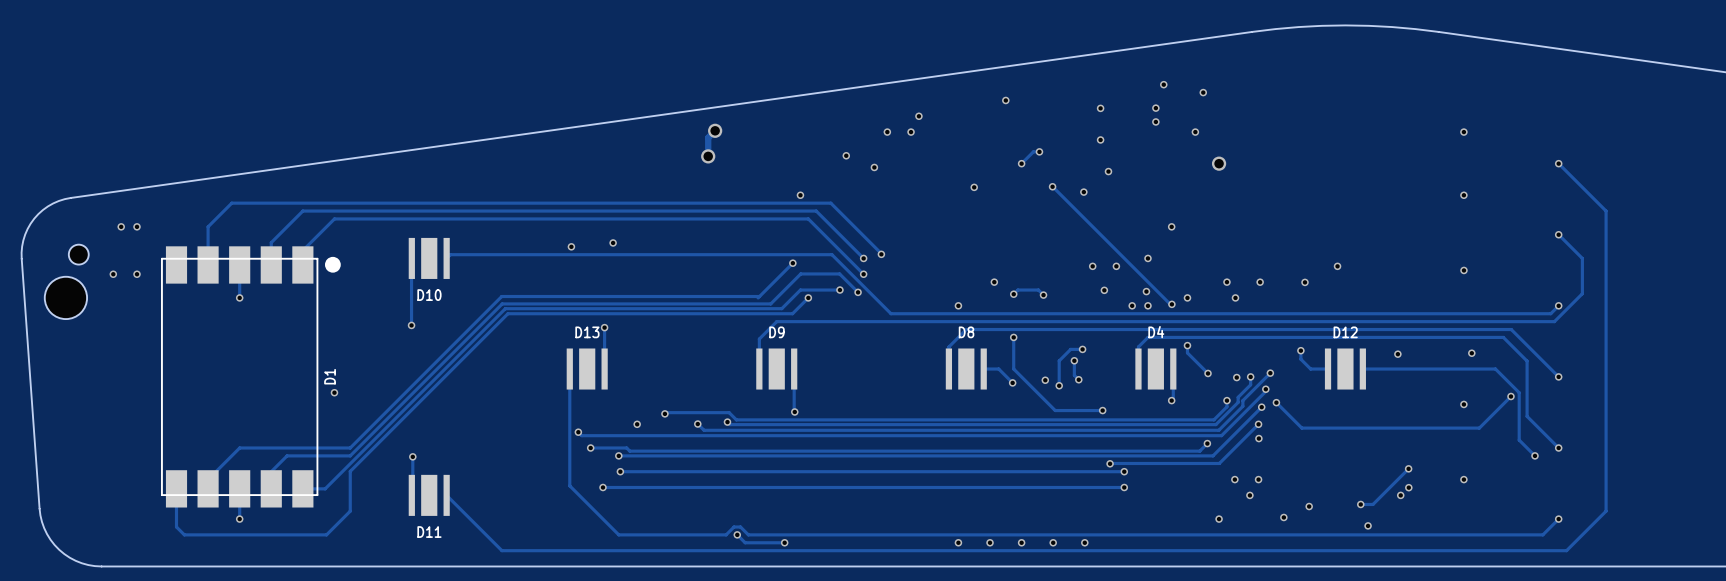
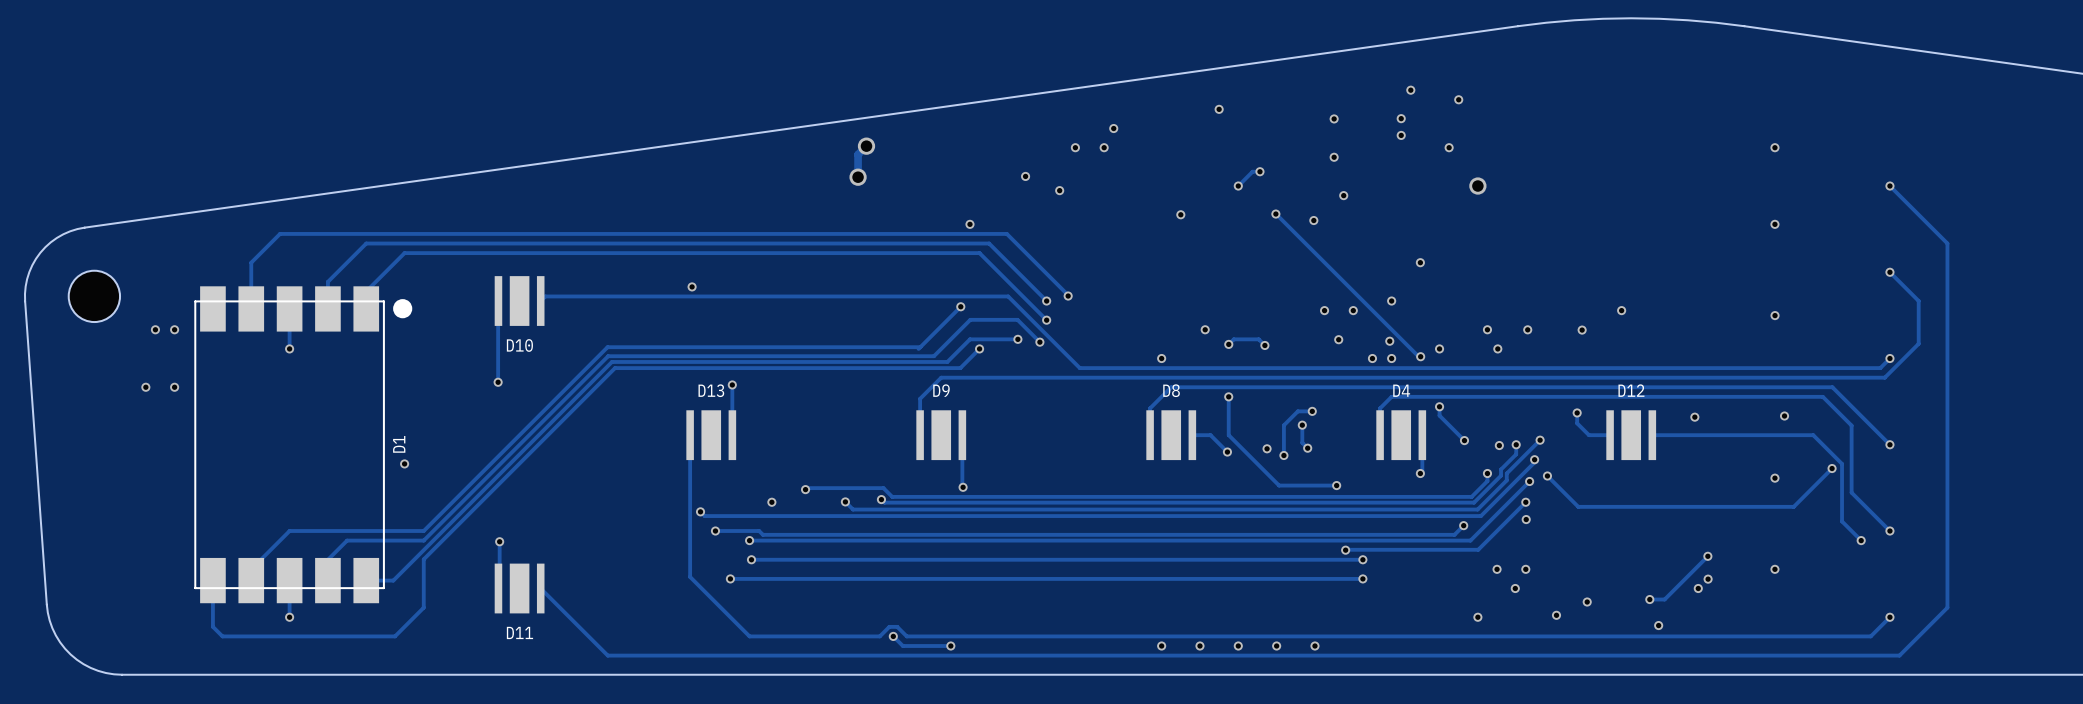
via: (121, 226) -> none
via: (137, 226) -> none
via: (613, 242) -> none
hole: (78, 254) -> none
via: (113, 274) -> none
via: (137, 274) -> none
via: none -> (155, 329)
via: none -> (174, 329)
part position: (65, 297) -> (94, 296)
via: none -> (145, 387)
via: none -> (174, 387)

